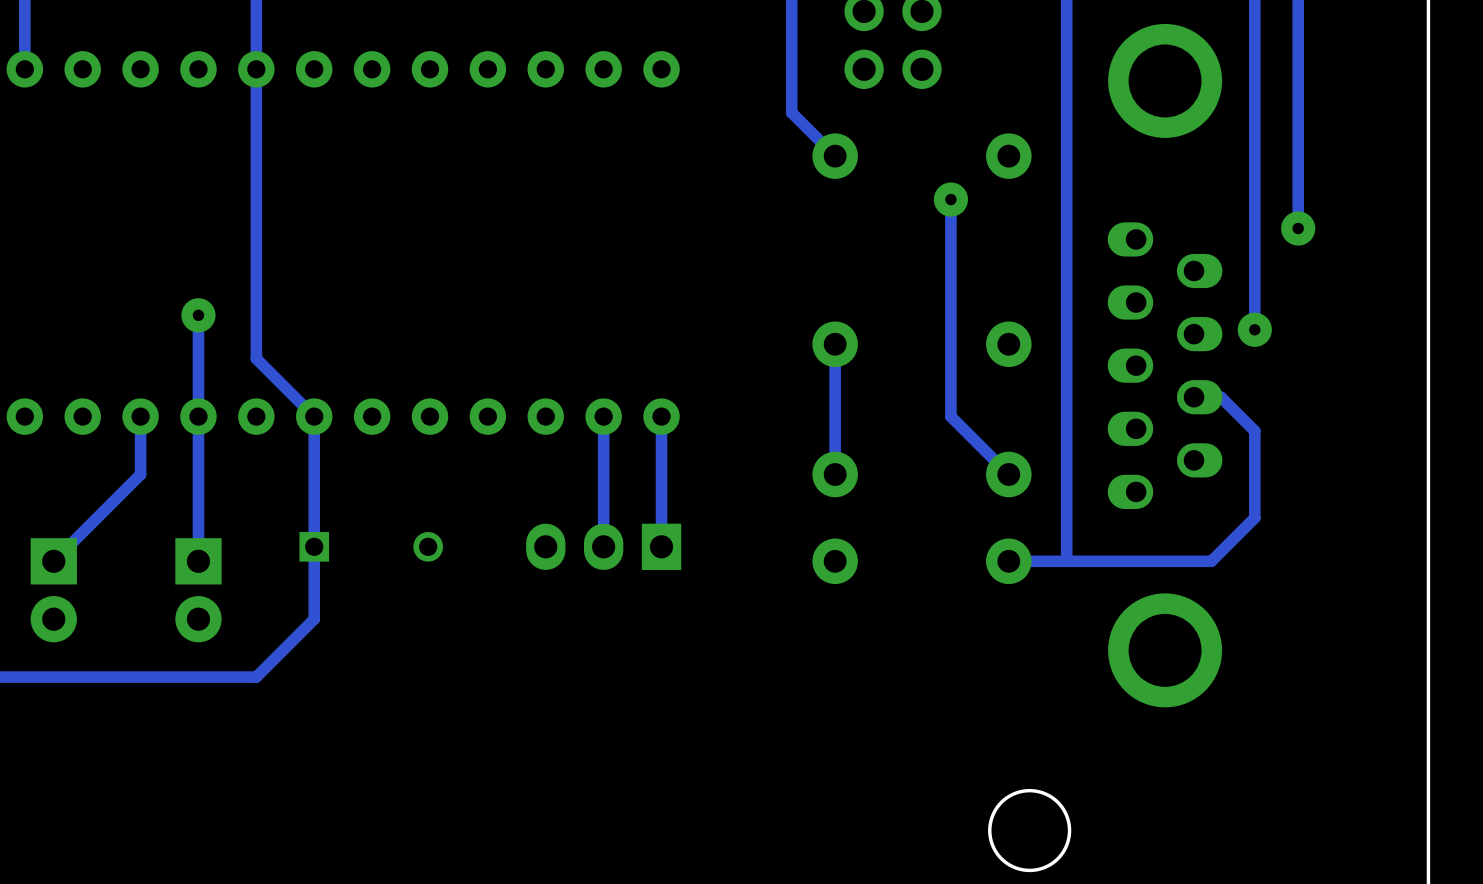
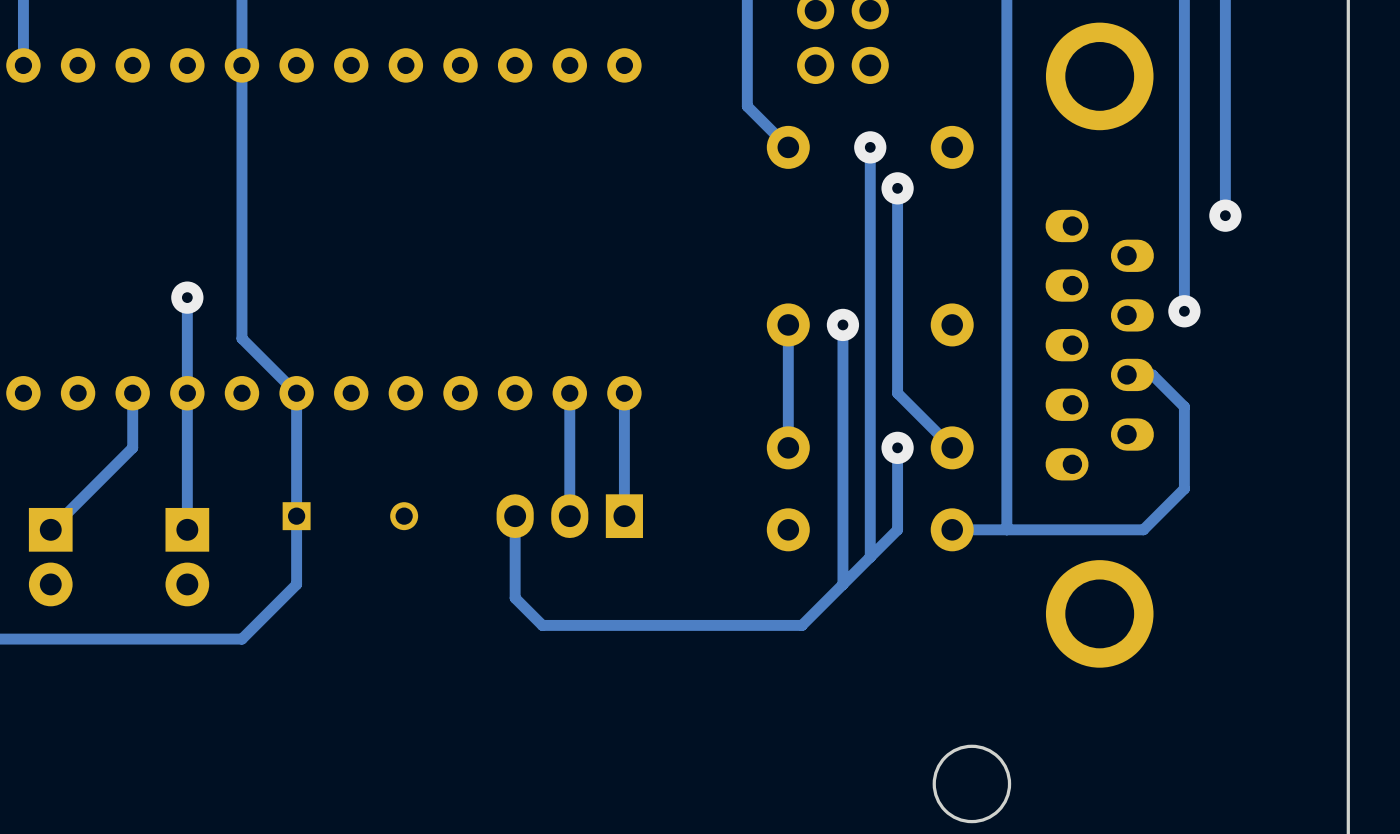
track: none -> (870, 147) (870, 557)
via: none -> (870, 147)
track: none -> (842, 324) (842, 584)
via: none -> (842, 324)
track: none -> (897, 447) (897, 529) (801, 625) (542, 625) (515, 598) (515, 516)
via: none -> (897, 447)

